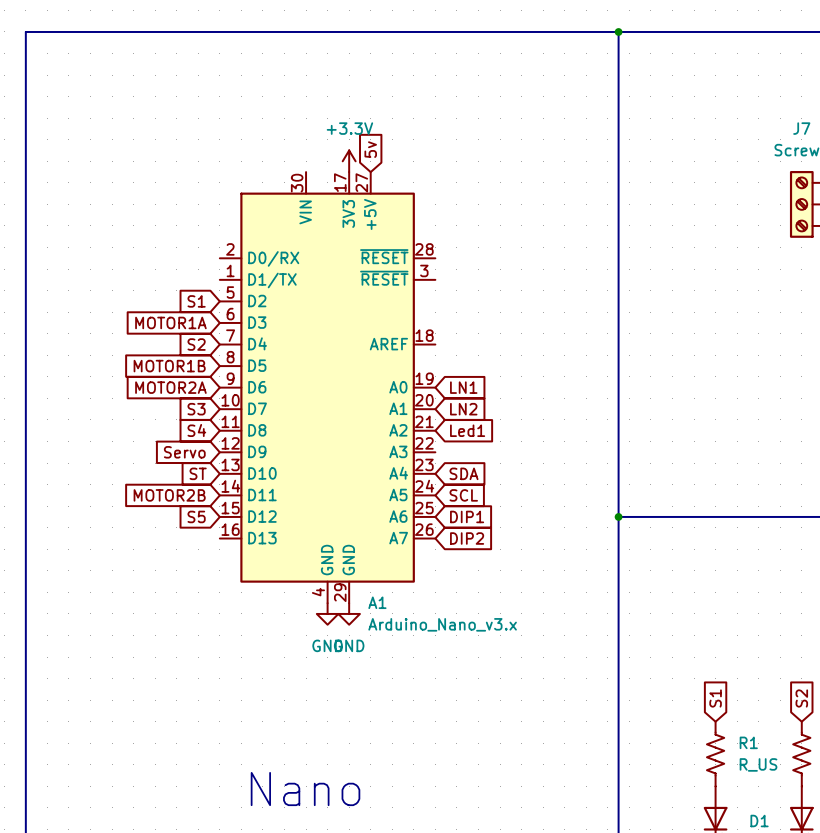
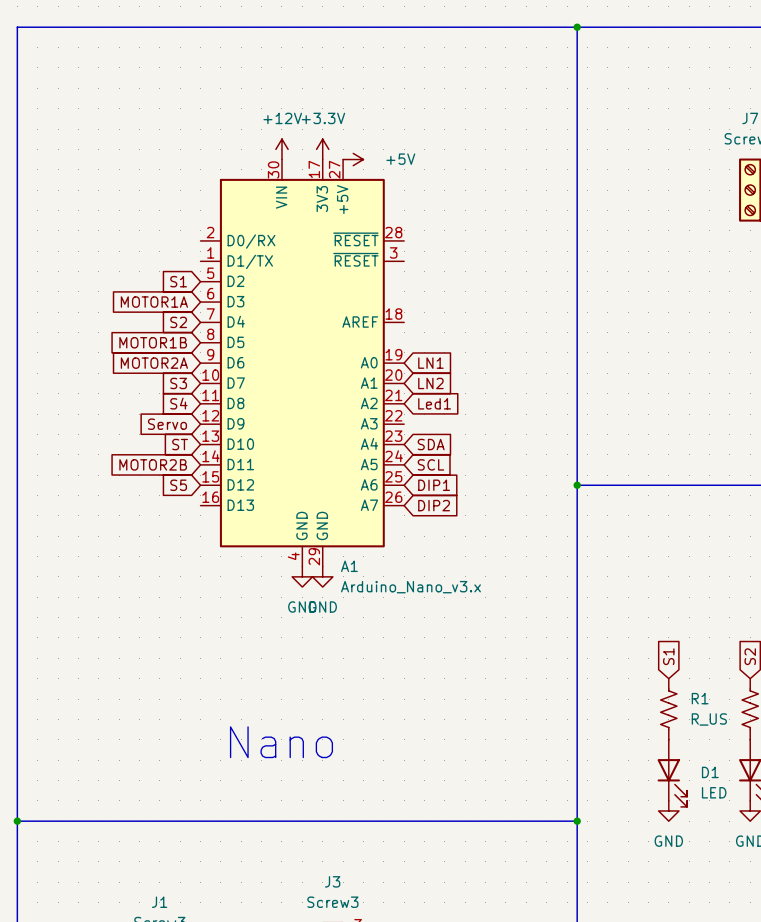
global label: 5v (370, 149) -> none
power symbol: none -> +12V (281, 149)
power symbol: none -> +5V (353, 159)

